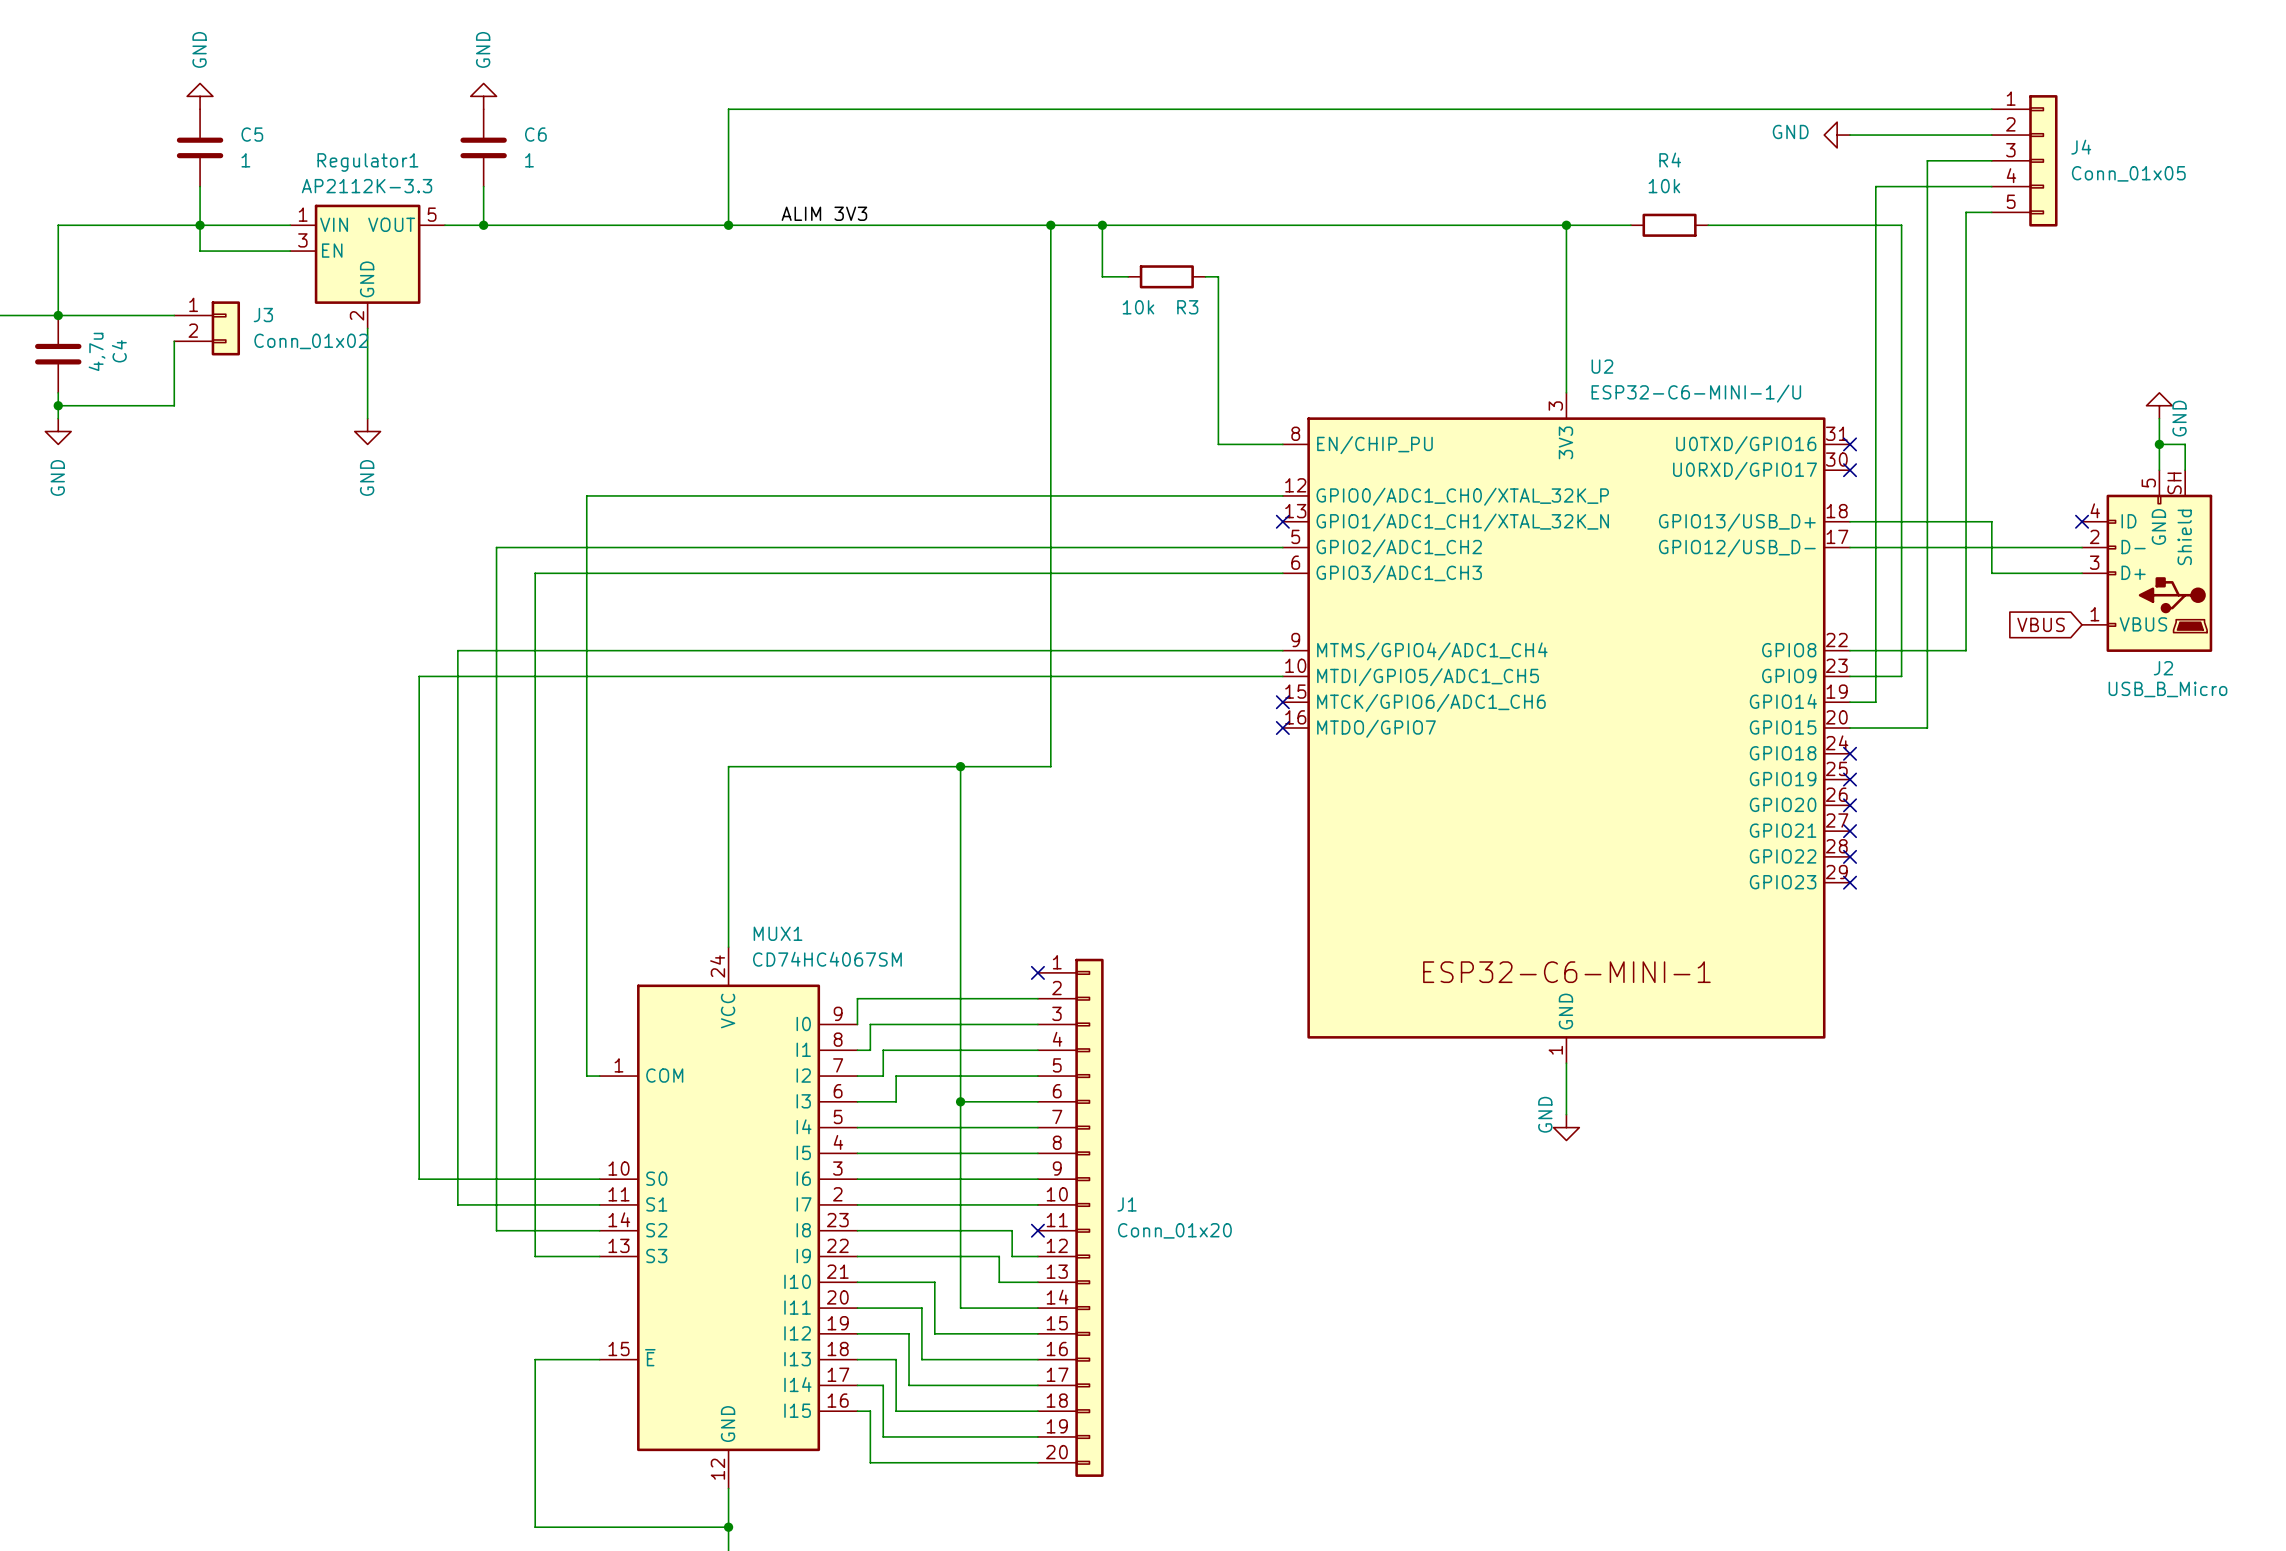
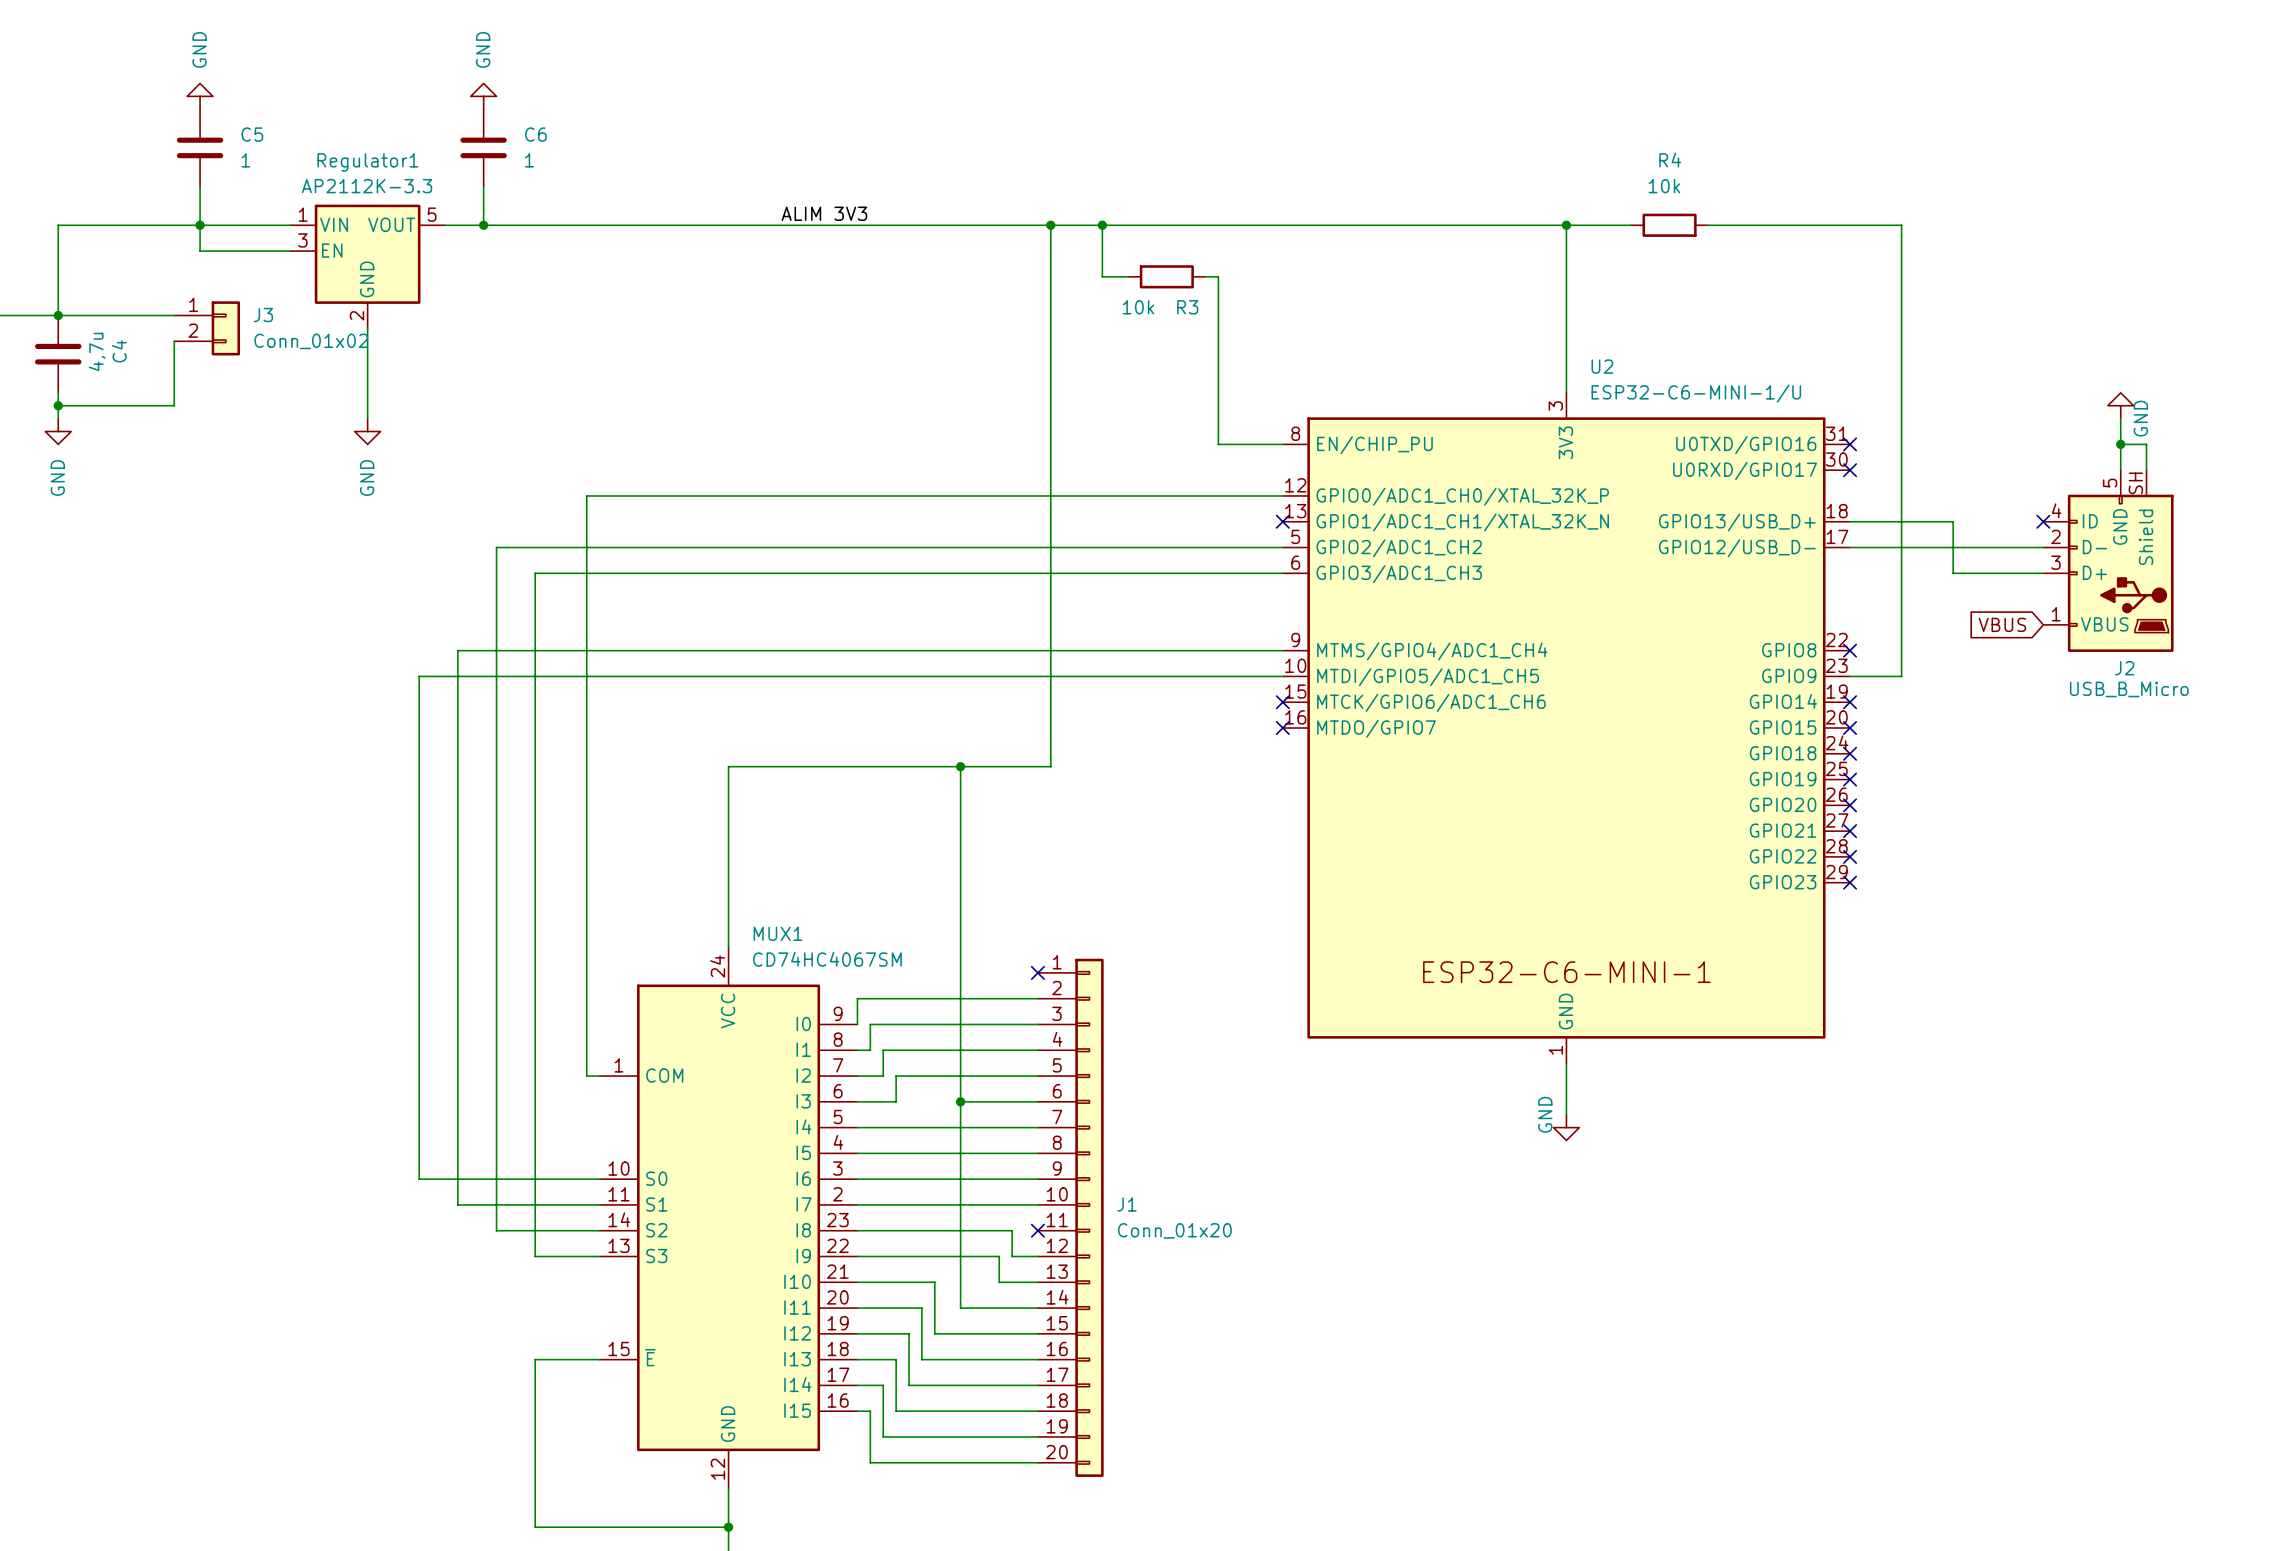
wire: (1991, 109) (728, 109) (728, 225) -> none
power symbol: GND (1837, 135) -> none
wire: (1850, 135) (1991, 135) -> none
wire: (1991, 160) (1927, 160) (1927, 728) (1850, 728) -> none
J4: Conn_01x05 (2024, 160) -> none
wire: (1991, 186) (1875, 186) (1875, 702) (1850, 702) -> none
wire: (1991, 212) (1966, 212) (1966, 650) (1850, 650) -> none
junction: (728, 225) -> none
power symbol position: GND (2159, 405) -> GND (2120, 405)
wire: (2159, 418) (2159, 470) -> (2120, 418) (2120, 470)
wire: (2159, 444) (2185, 444) (2185, 470) -> (2120, 444) (2146, 444) (2146, 470)
junction position: (2159, 444) -> (2120, 444)
wire: (1953, 521) (1991, 521) (1991, 573) -> (1953, 521) (1953, 573) (1991, 573)
no-connect mark position: (2082, 521) -> (2043, 521)
J2 position: (2147, 561) -> (2108, 561)
global label position: VBUS (2041, 624) -> VBUS (2002, 624)
no-connect mark: none -> (1850, 650)
no-connect mark: none -> (1850, 702)
no-connect mark: none -> (1850, 728)

